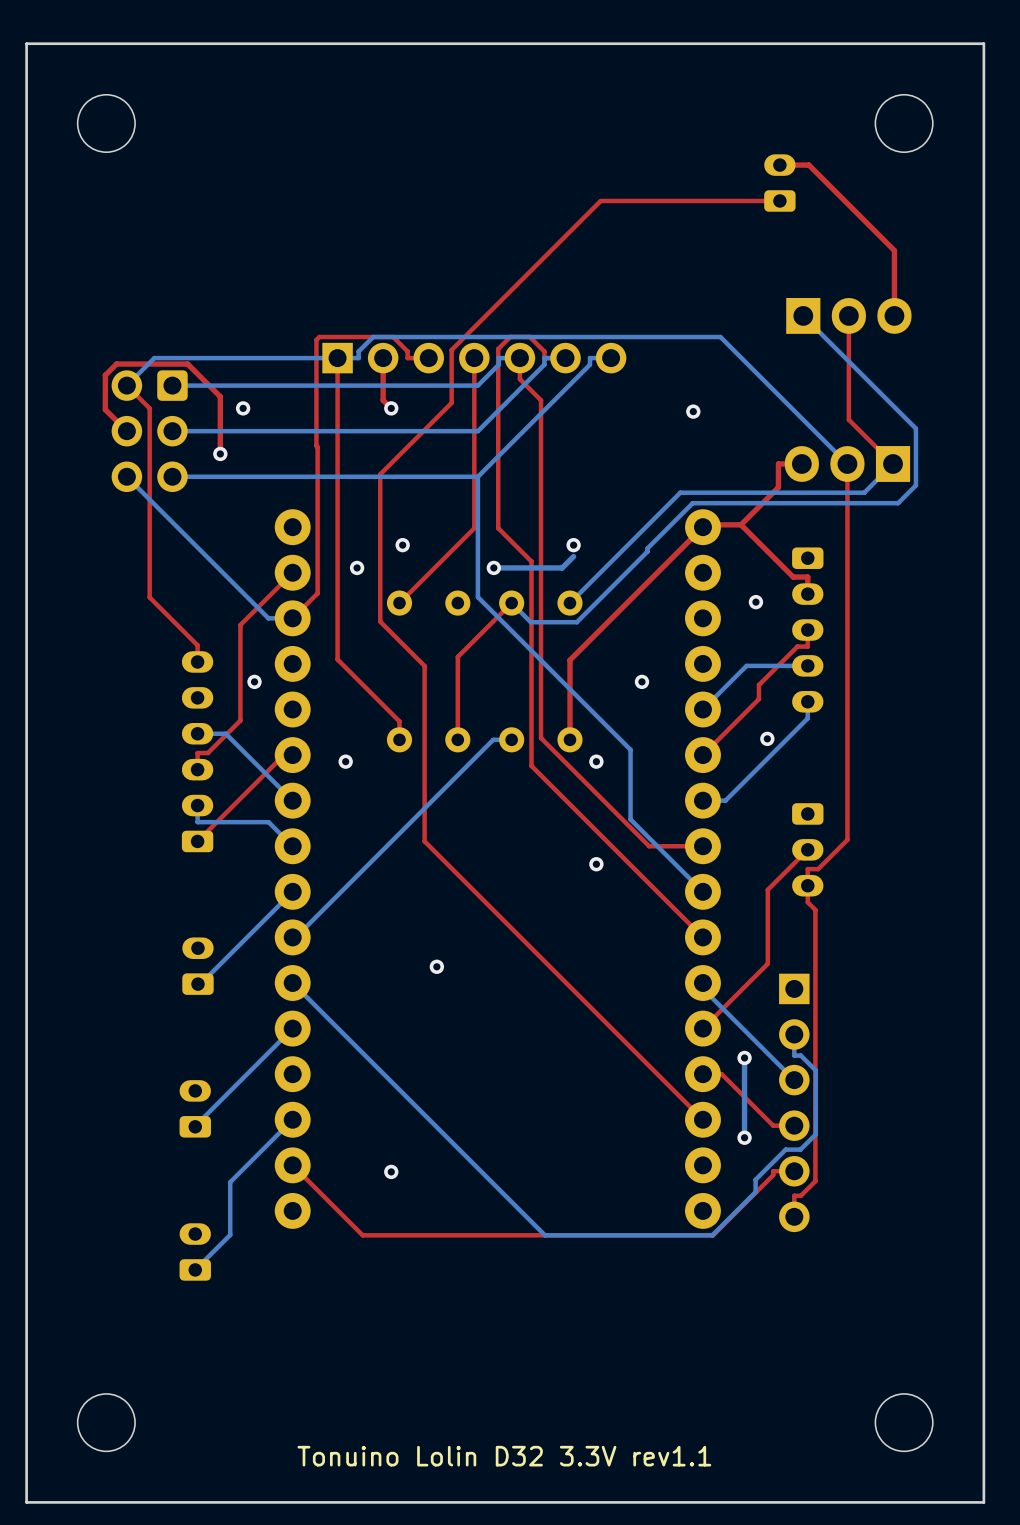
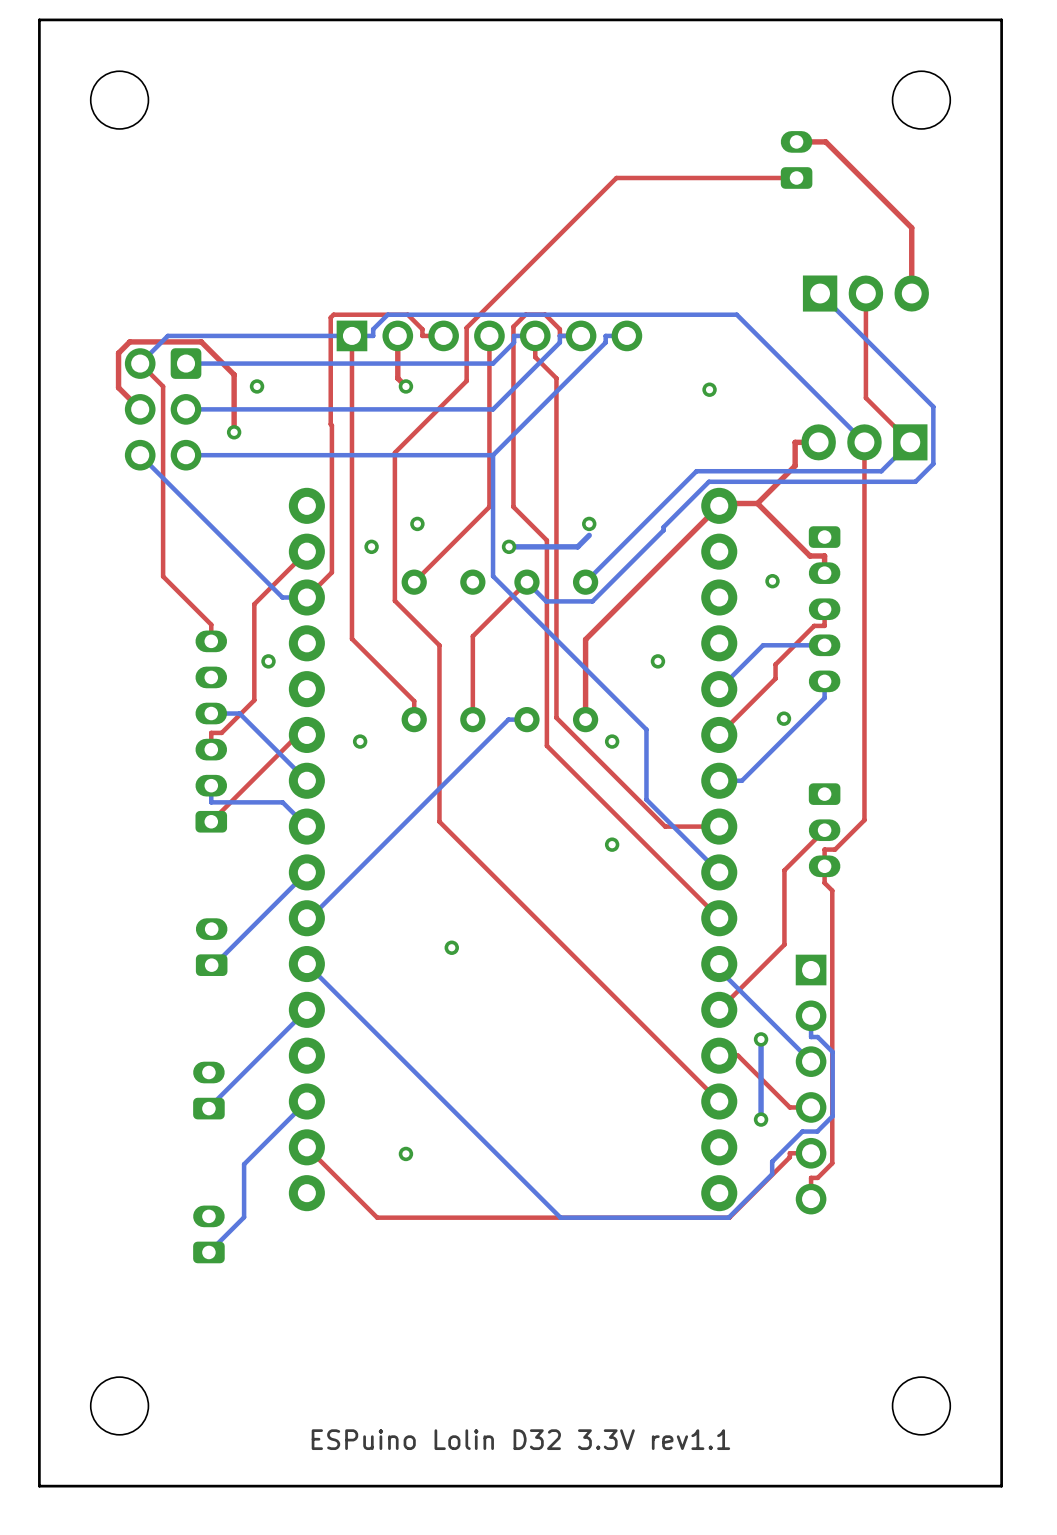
text: Tonuino Lolin D32 3.3V rev1.1 (504, 1456) -> ESPuino Lolin D32 3.3V rev1.1 (520, 1439)

